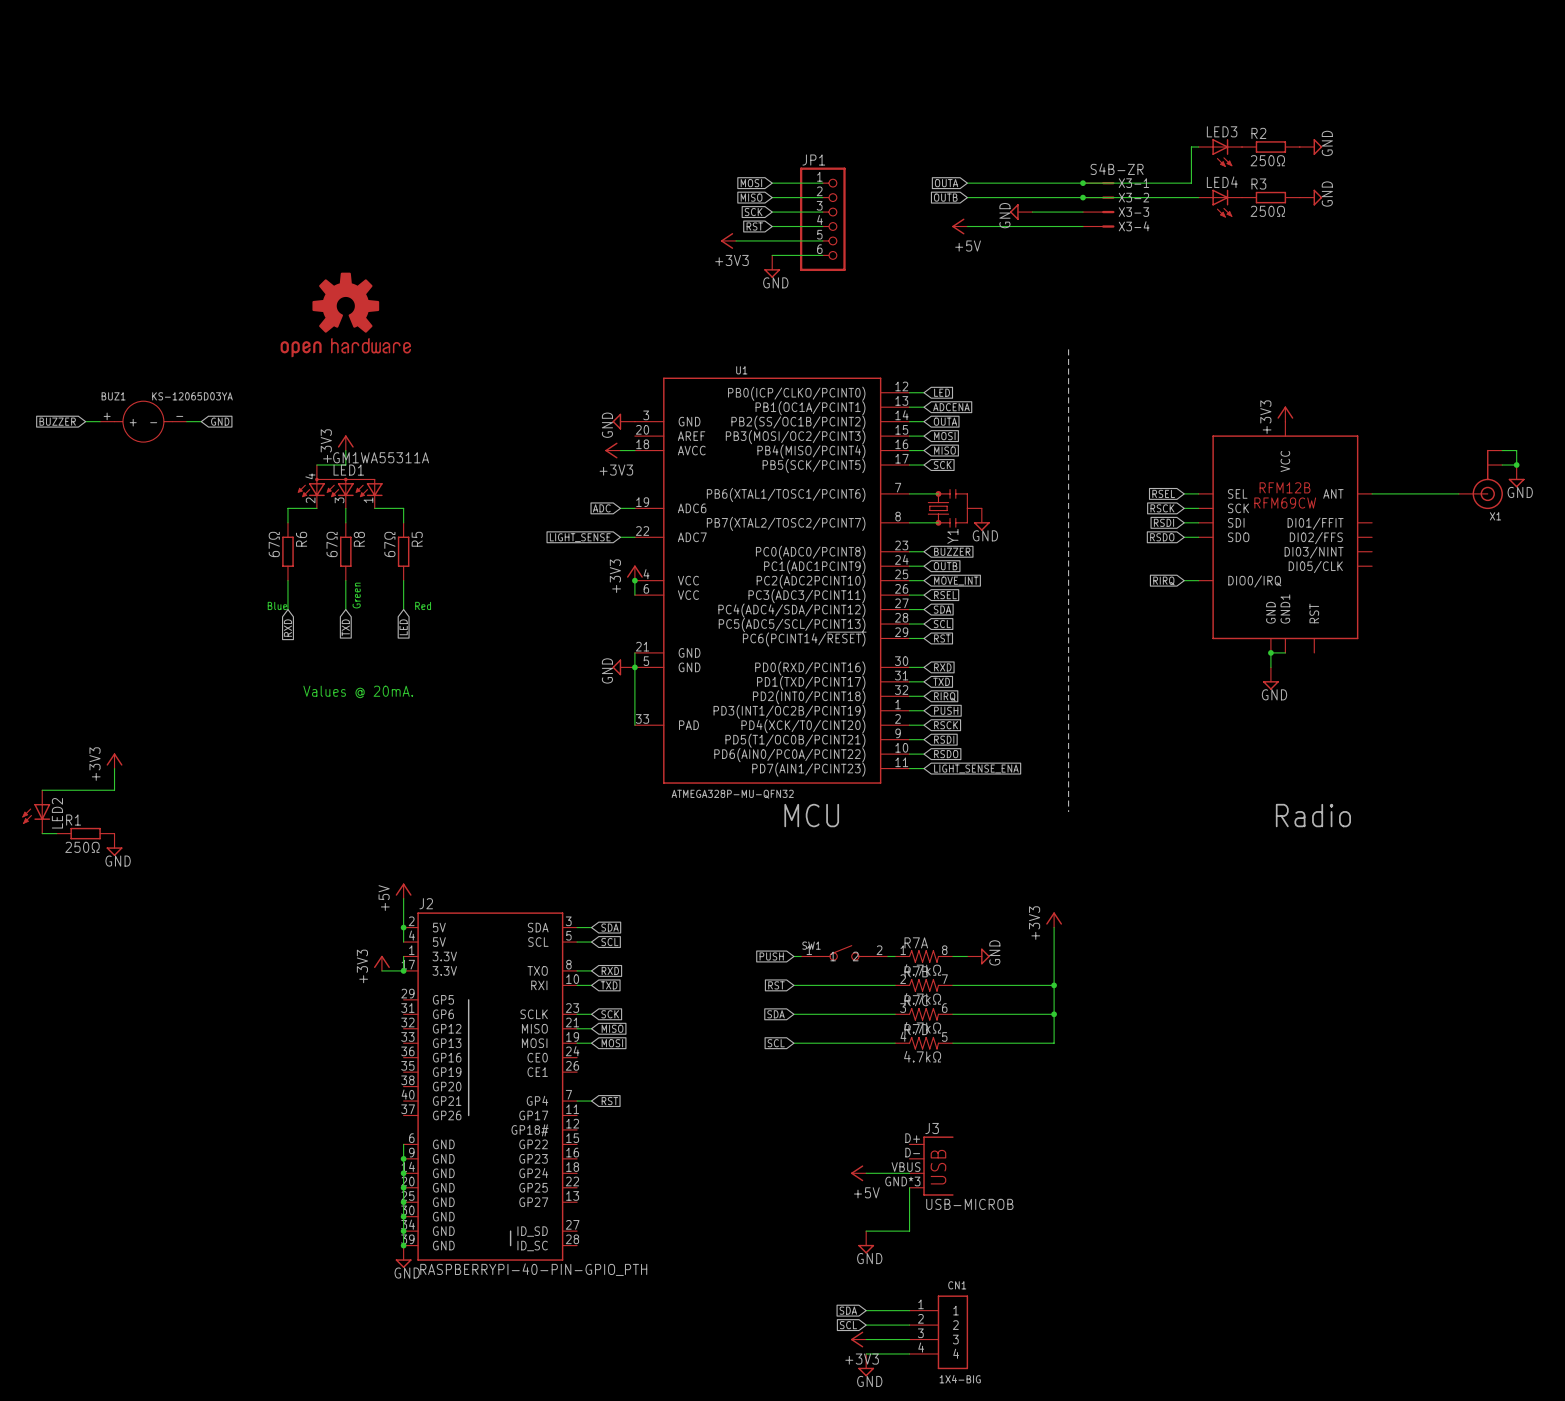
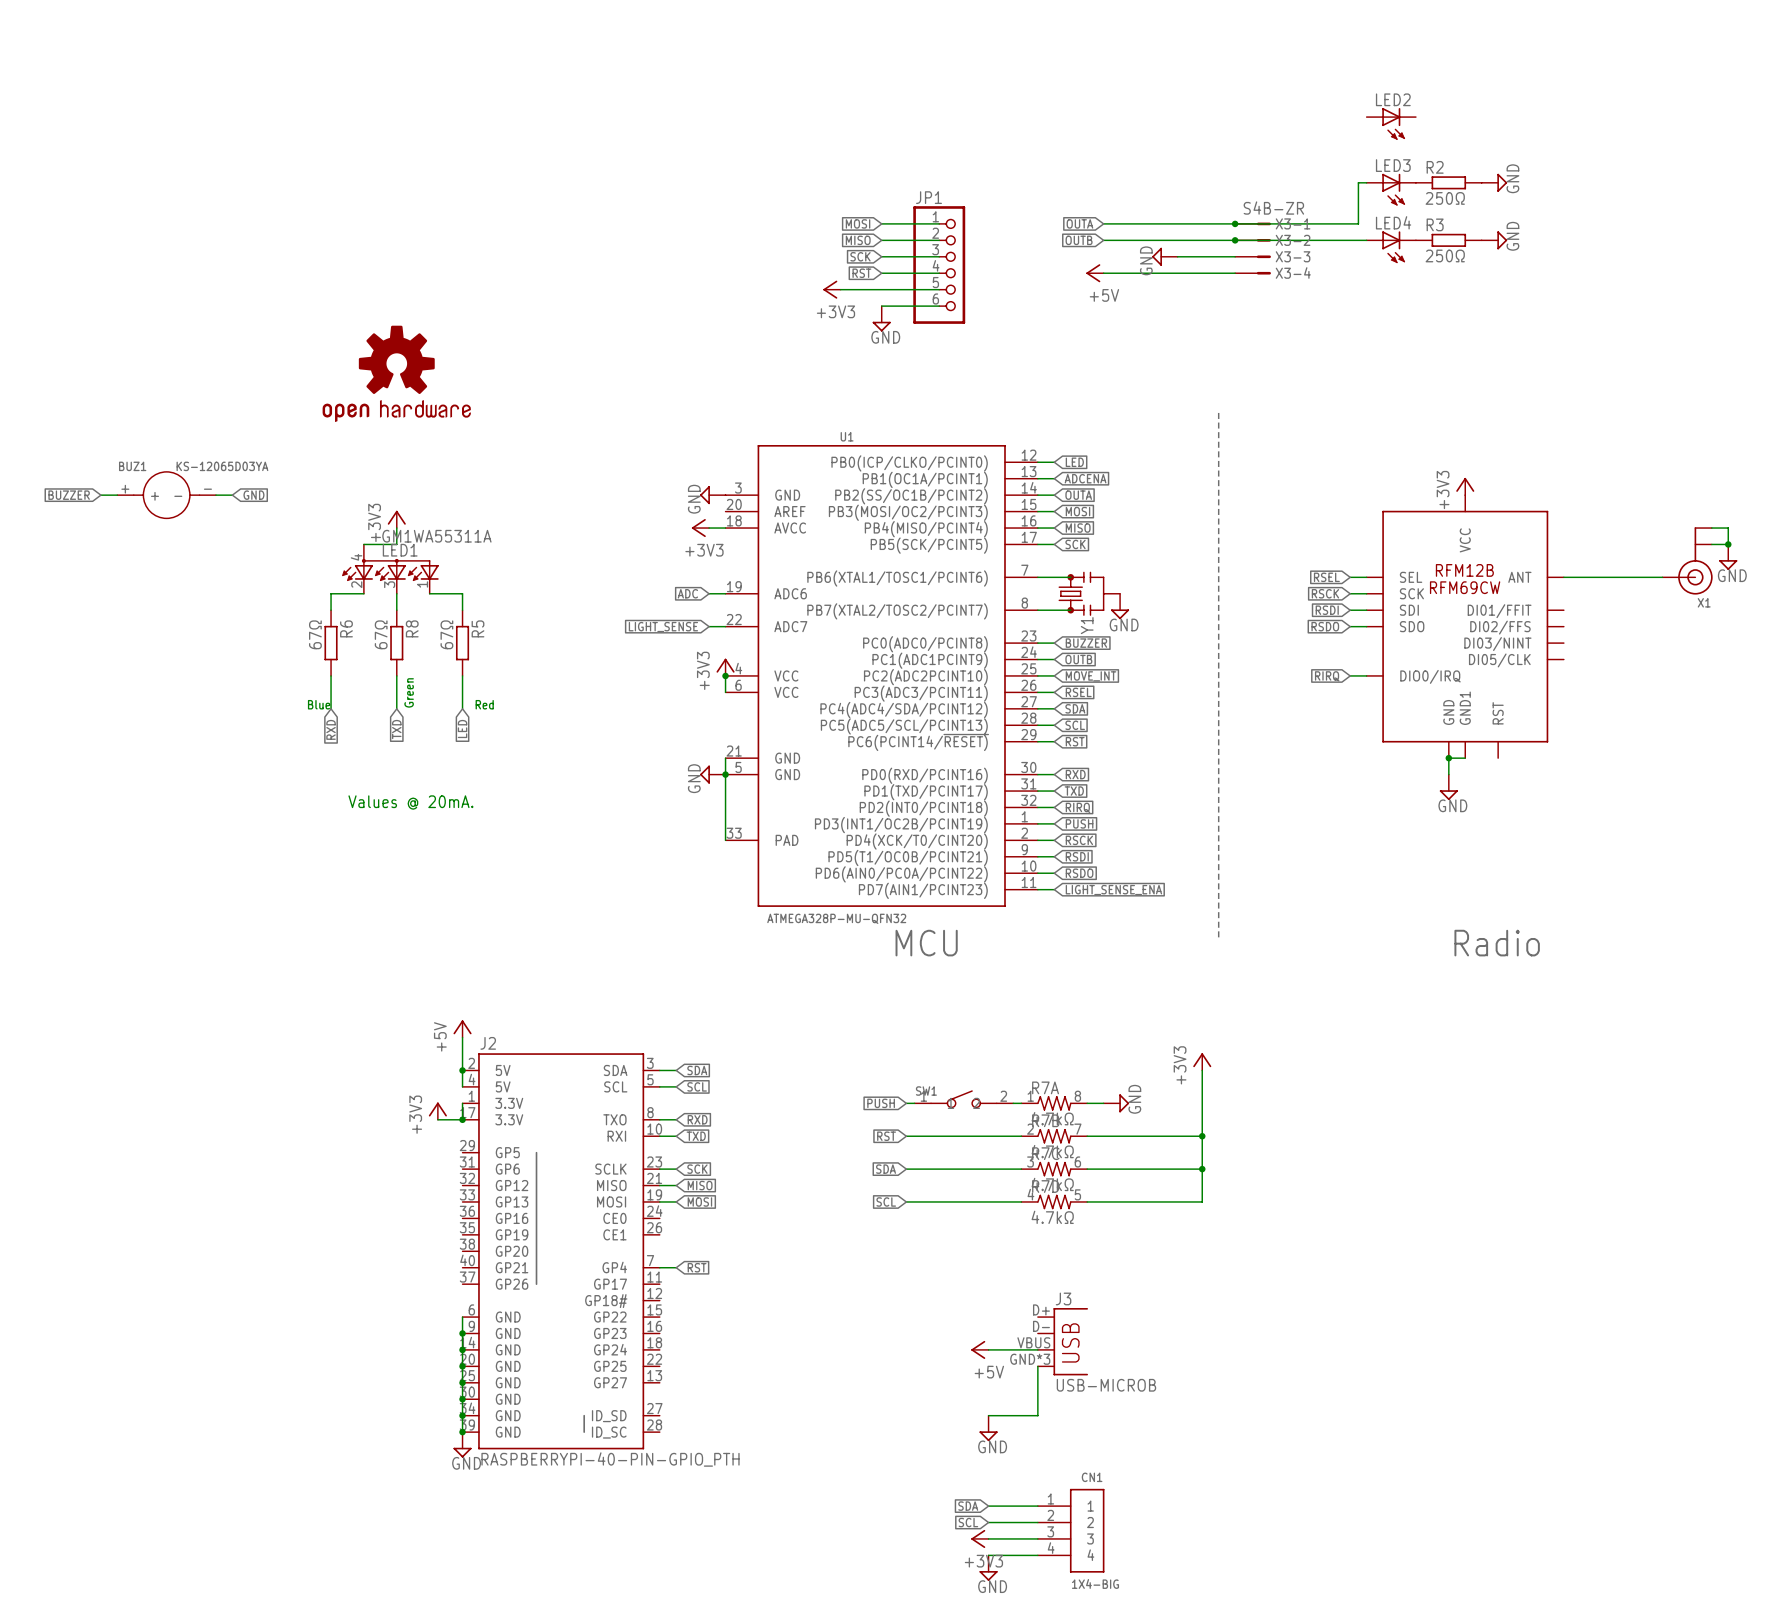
power symbol: +3V3 (114, 760) -> none
wire: (114, 768) (114, 790) (42, 790) -> none
LED2 position: (36, 811) -> (1391, 123)
LED2 rotation: 0° (36, 813) -> 90° counterclockwise (1393, 123)
wire: (42, 833) (56, 833) -> none
R1: 250Ω (85, 833) -> none
power symbol: GND (114, 844) -> none

